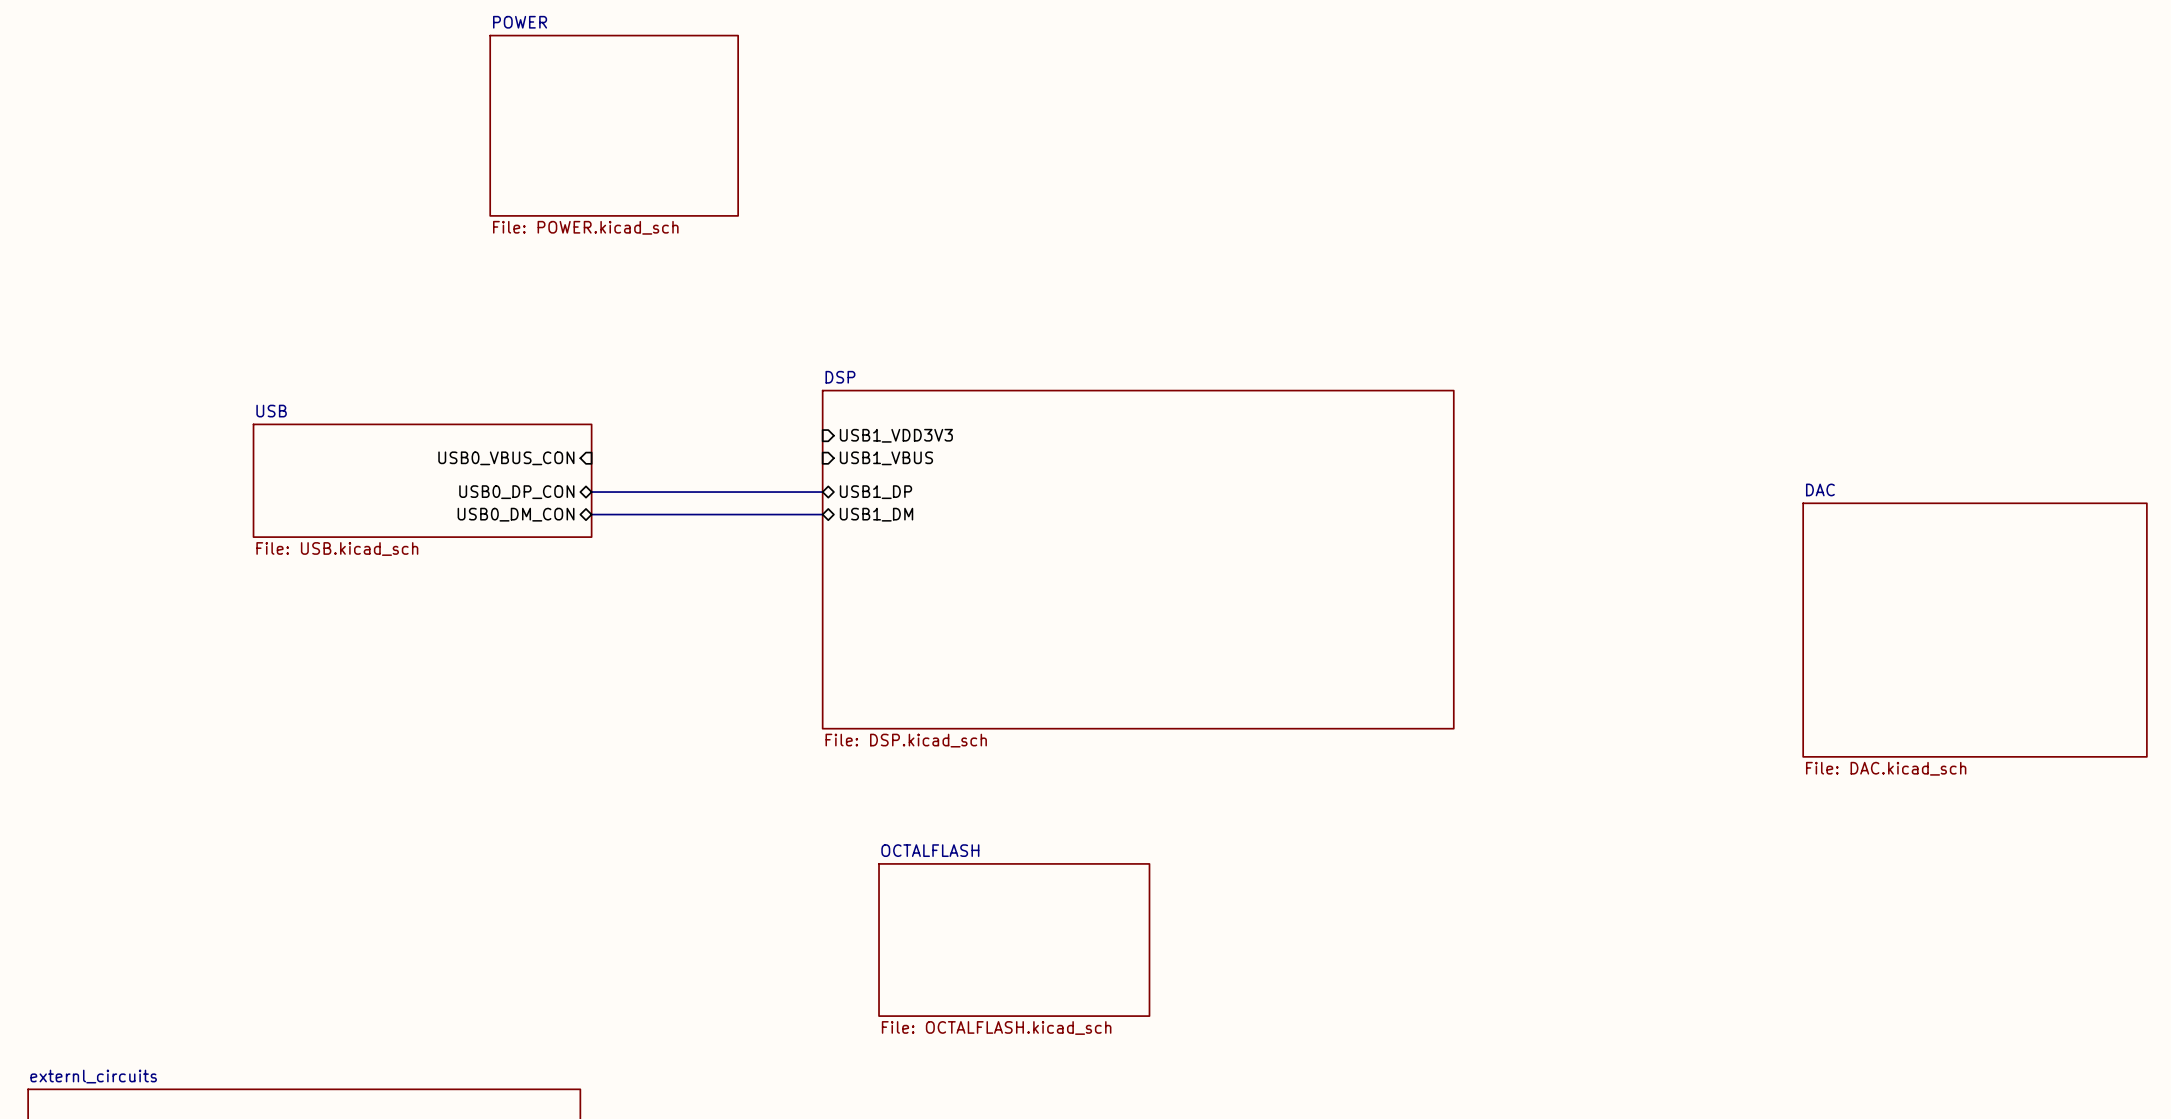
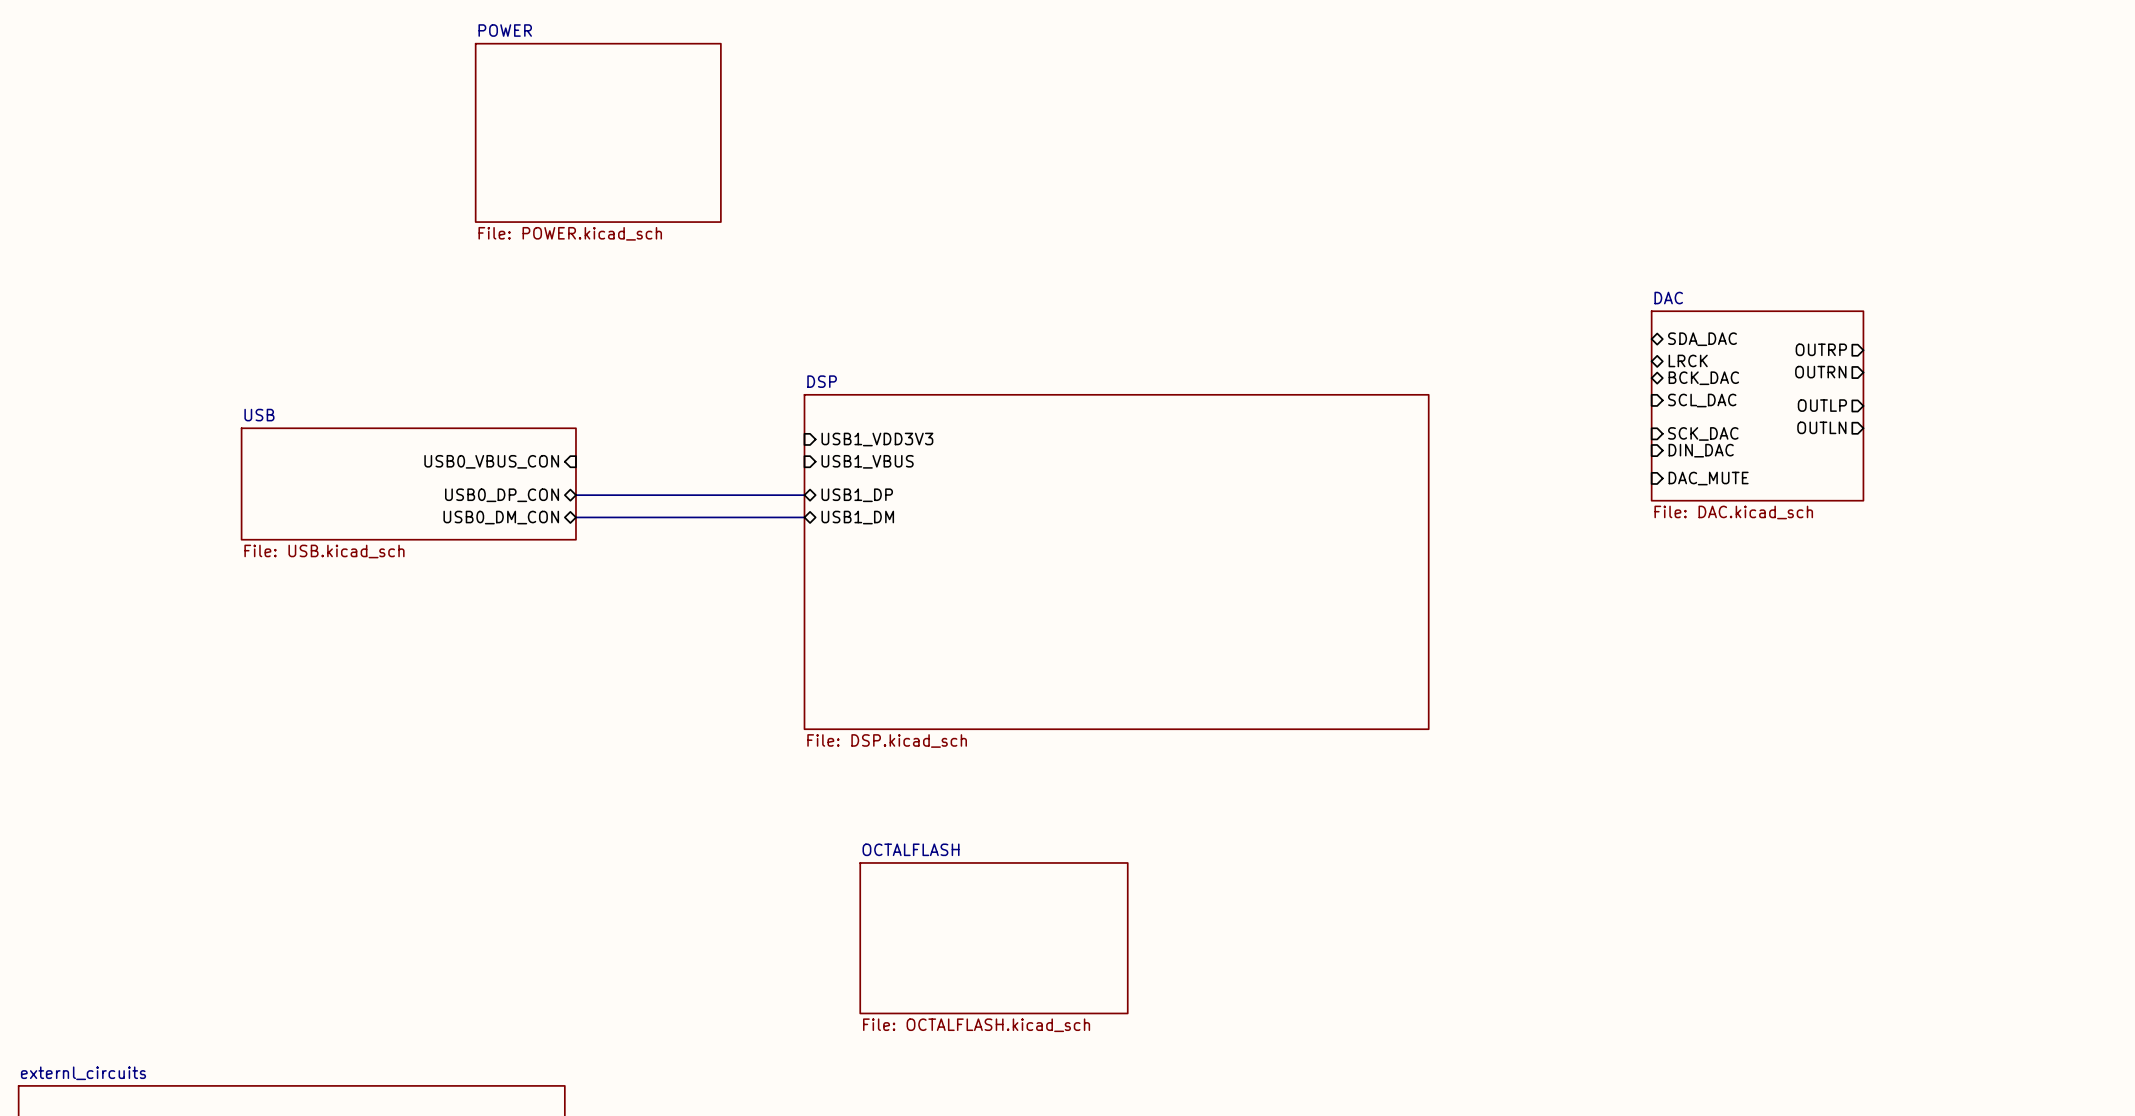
sheet pin: none -> SDA_DAC (1702, 339)
sheet pin: none -> OUTRP (1821, 349)
sheet pin: none -> LRCK (1688, 360)
sheet pin: none -> OUTRN (1820, 372)
sheet pin: none -> BCK_DAC (1703, 378)
sheet pin: none -> SCL_DAC (1702, 400)
sheet DAC: none -> File: DAC.kicad_sch (1757, 405)
sheet pin: none -> OUTLP (1822, 405)
sheet pin: none -> OUTLN (1821, 427)
sheet pin: none -> SCK_DAC (1703, 433)
sheet pin: none -> DIN_DAC (1701, 450)
sheet pin: none -> DAC_MUTE (1708, 478)
sheet DAC: File: DAC.kicad_sch (1975, 630) -> none

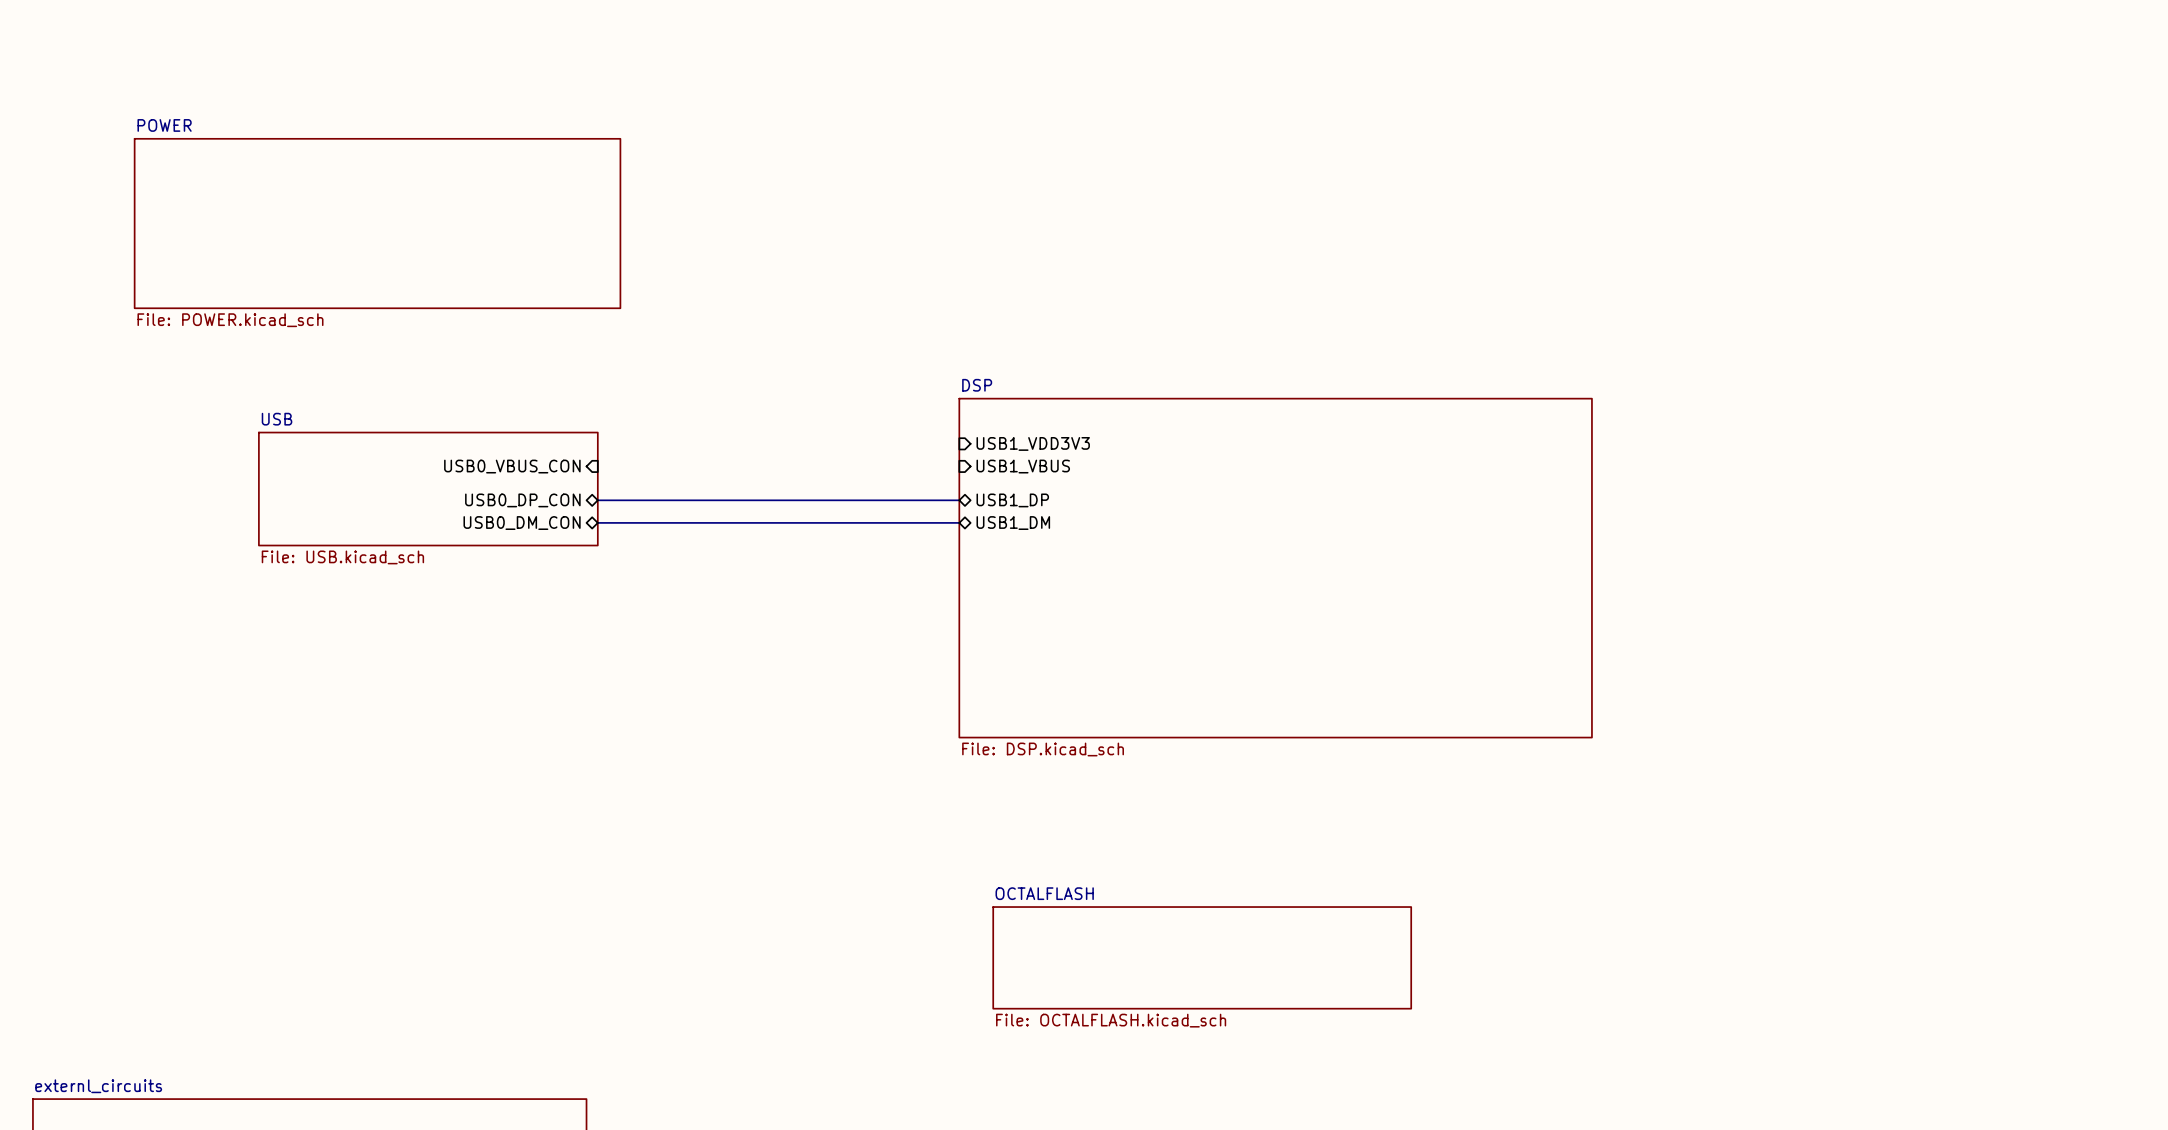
sheet POWER: File: POWER.kicad_sch (598, 132) -> none
sheet POWER: none -> File: POWER.kicad_sch (377, 223)
sheet pin: SDA_DAC (1702, 339) -> none
sheet pin: OUTRP (1821, 349) -> none
sheet pin: LRCK (1688, 360) -> none
sheet pin: OUTRN (1820, 372) -> none
sheet pin: BCK_DAC (1703, 378) -> none
sheet pin: SCL_DAC (1702, 400) -> none
sheet DAC: File: DAC.kicad_sch (1757, 405) -> none
sheet pin: OUTLP (1822, 405) -> none
sheet pin: OUTLN (1821, 427) -> none
sheet pin: SCK_DAC (1703, 433) -> none
sheet pin position: USB1_VDD3V3 (877, 439) -> USB1_VDD3V3 (1033, 443)
sheet pin: DIN_DAC (1701, 450) -> none
sheet pin position: USB1_VBUS (867, 461) -> USB1_VBUS (1023, 466)
sheet pin: DAC_MUTE (1708, 478) -> none
wire: none -> (829, 500) (959, 500)
sheet pin position: USB1_DP (857, 495) -> USB1_DP (1012, 500)
wire: none -> (829, 522) (959, 522)
sheet pin position: USB1_DM (857, 517) -> USB1_DM (1013, 523)
sheet DSP position: (1116, 562) -> (1275, 568)
sheet OCTALFLASH: File: OCTALFLASH.kicad_sch (993, 938) -> none
sheet OCTALFLASH: none -> File: OCTALFLASH.kicad_sch (1202, 957)

